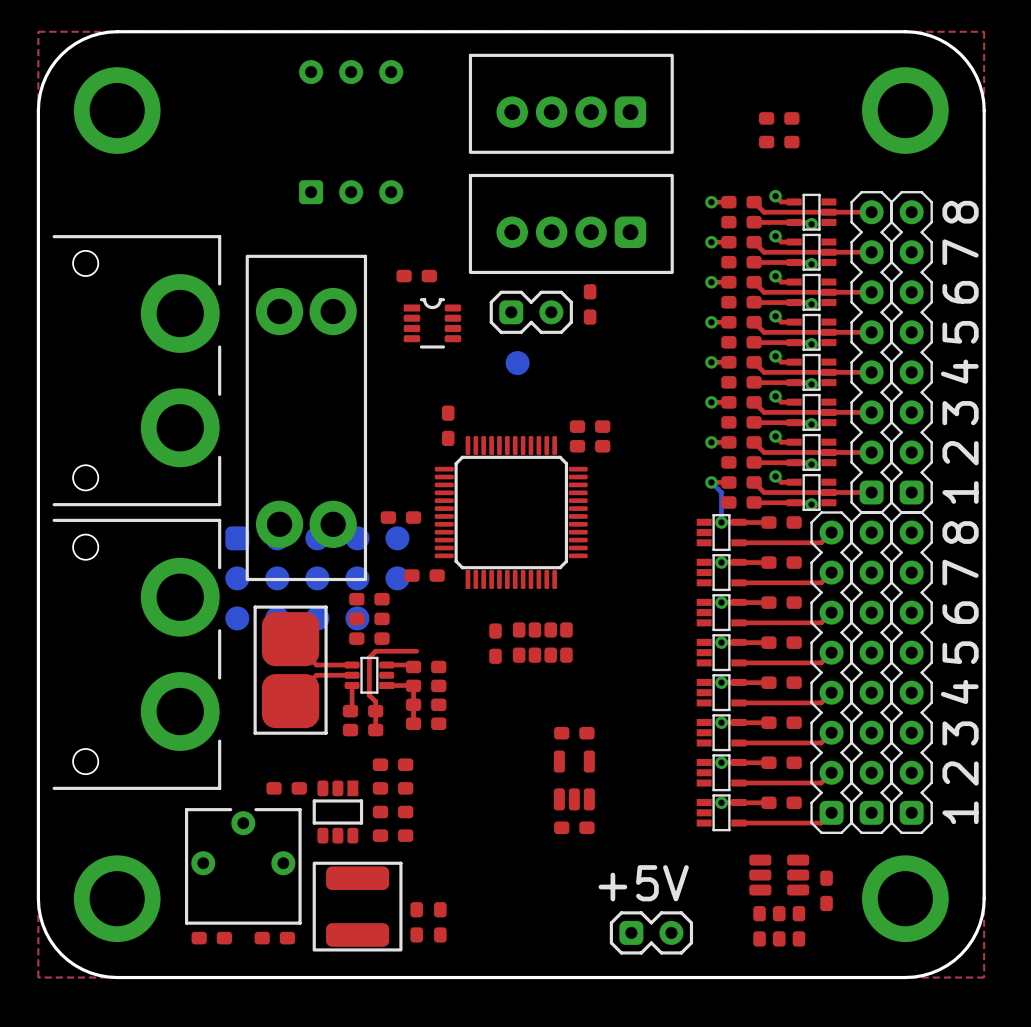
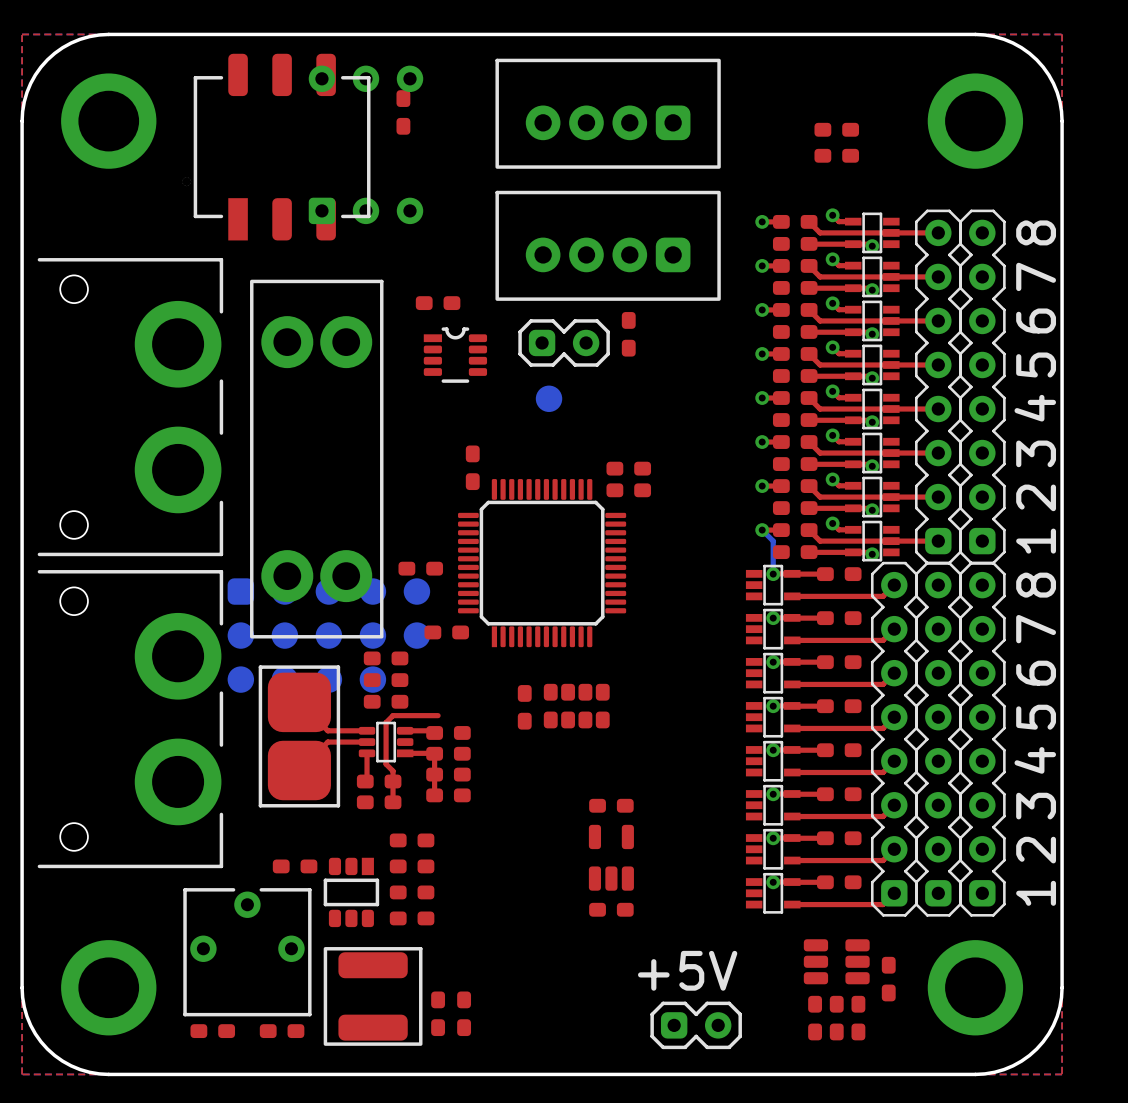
part: none -> (403, 112)
part: none -> (276, 147)

